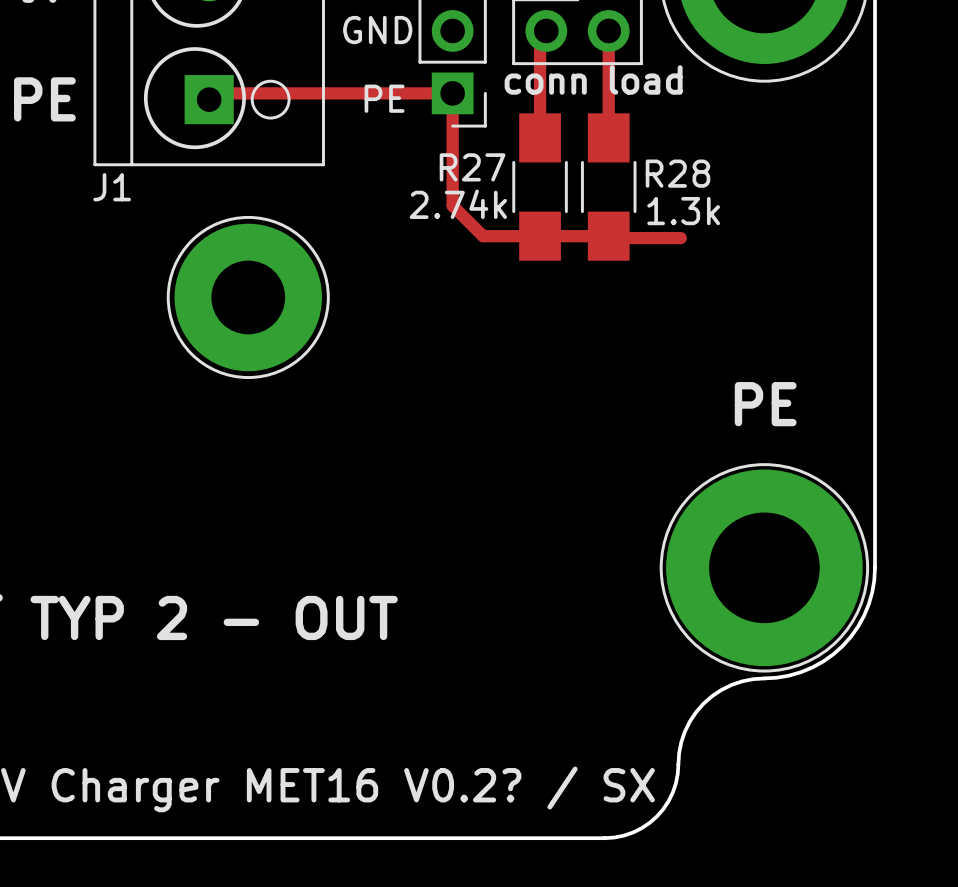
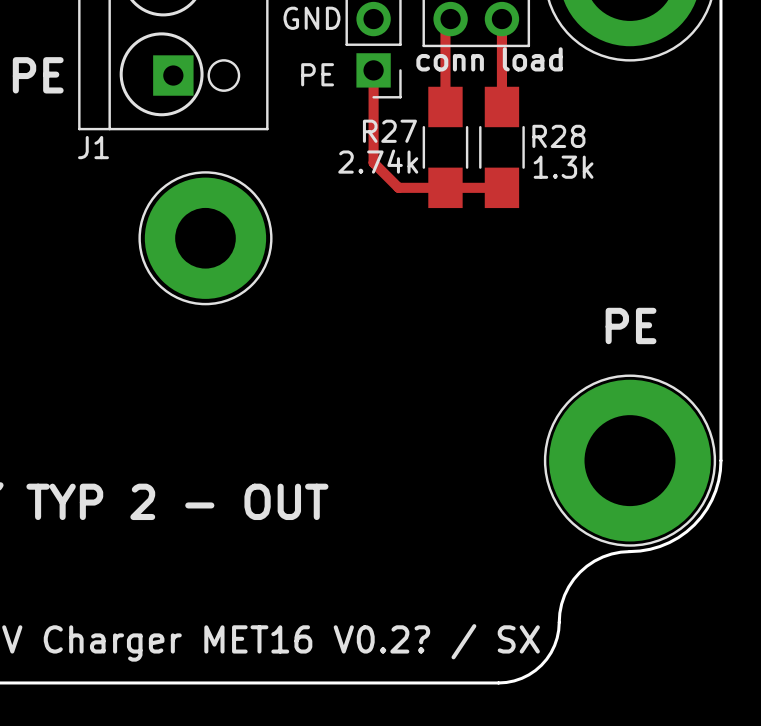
track: (452, 93) (215, 93) (209, 99) -> none
track: (608, 236) (610, 238) (680, 238) -> none

